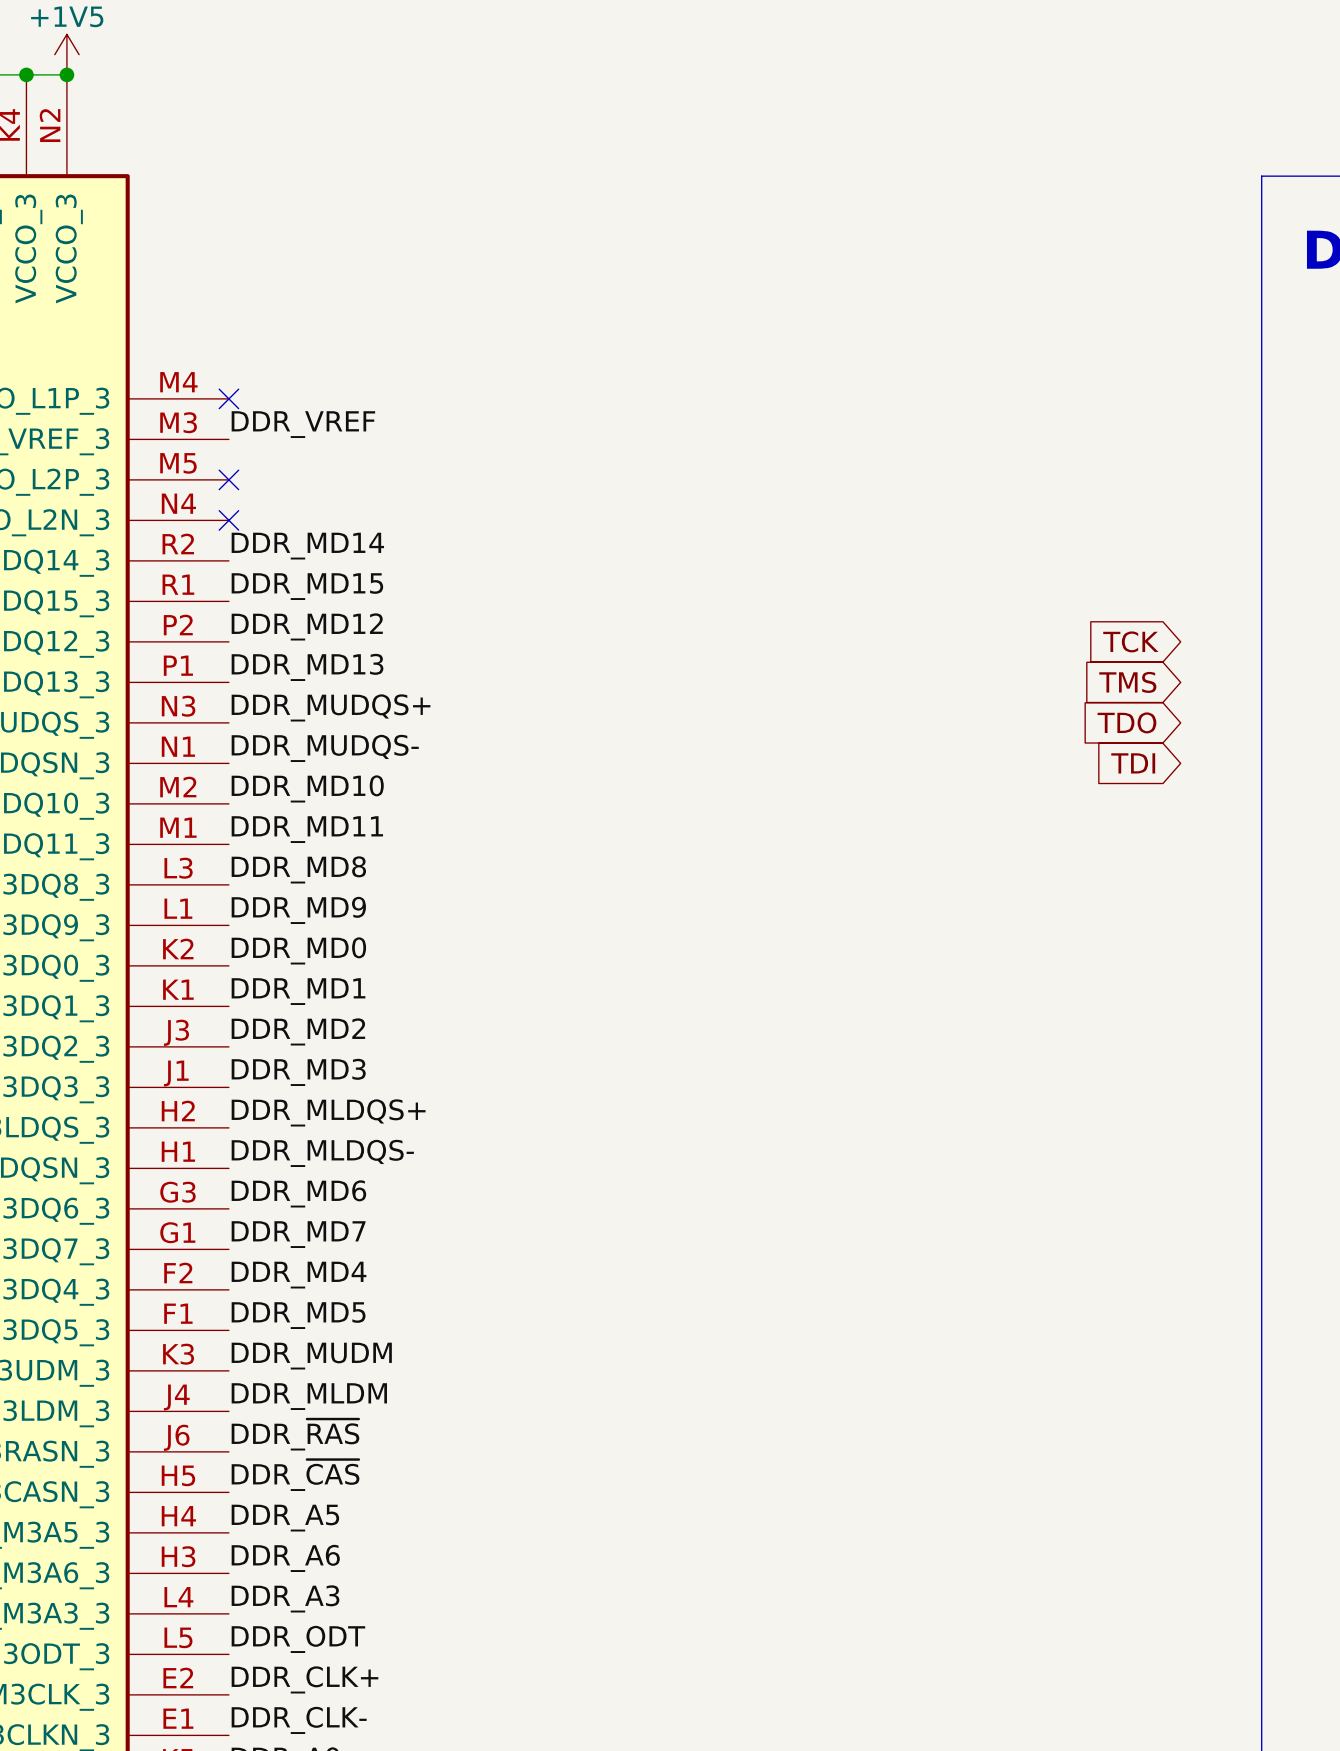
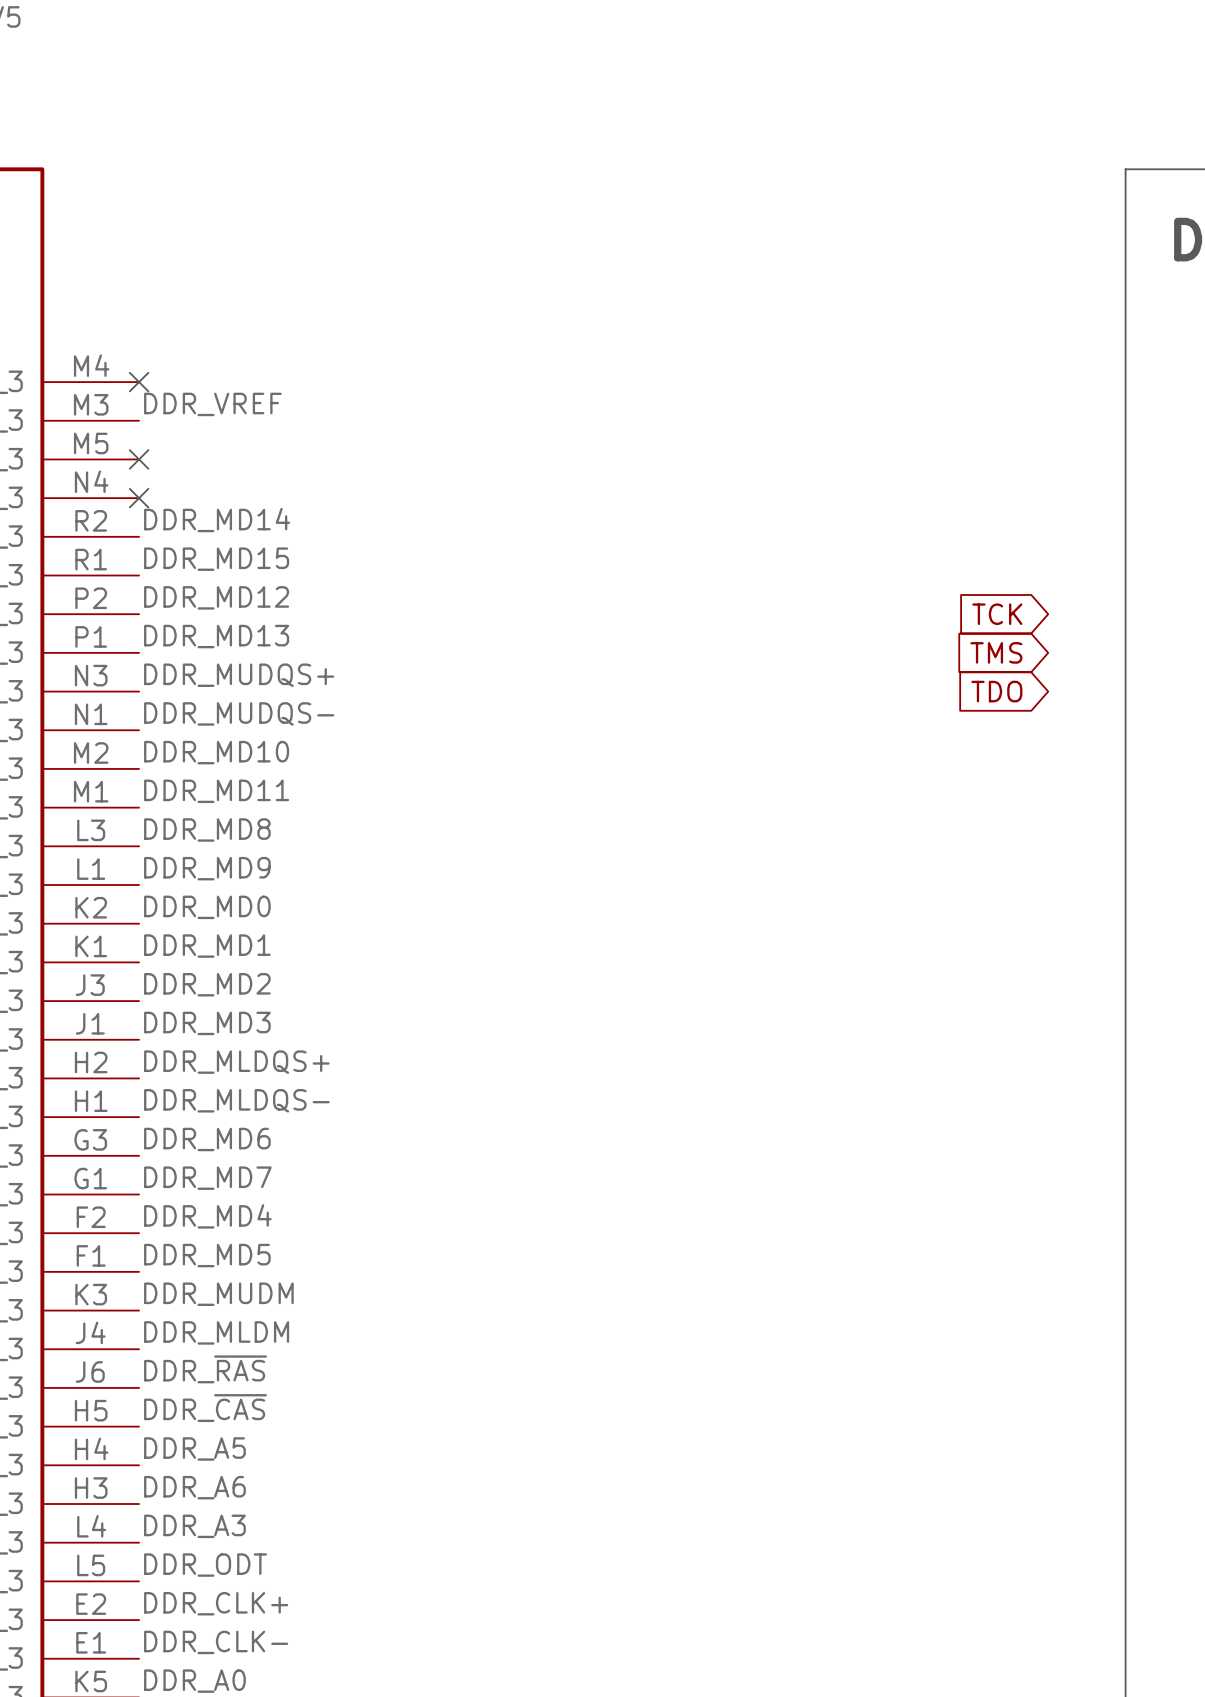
global label: TDI (1133, 763) -> none

